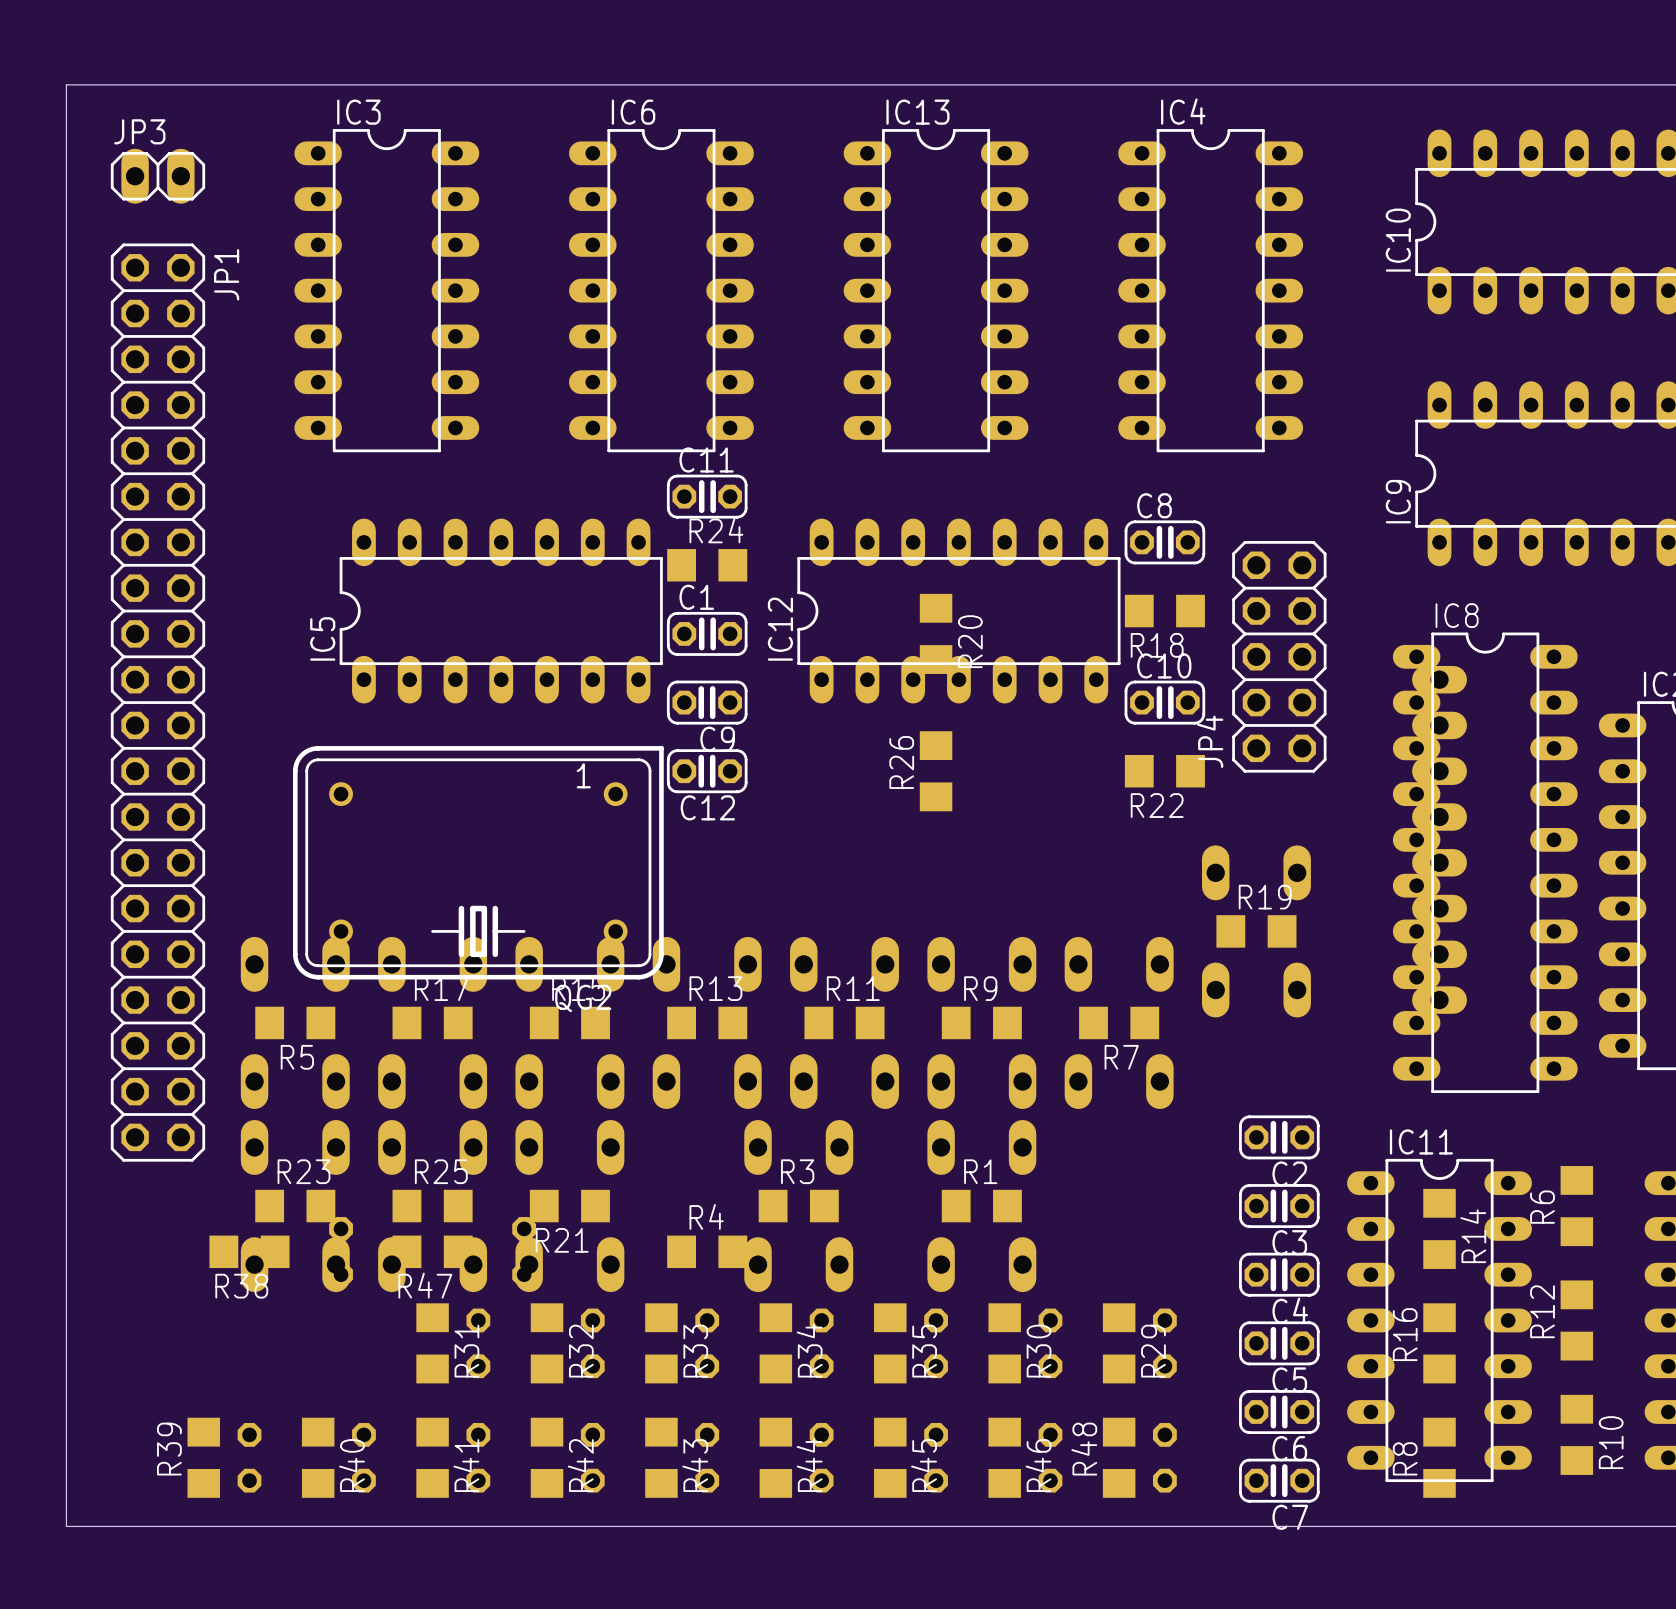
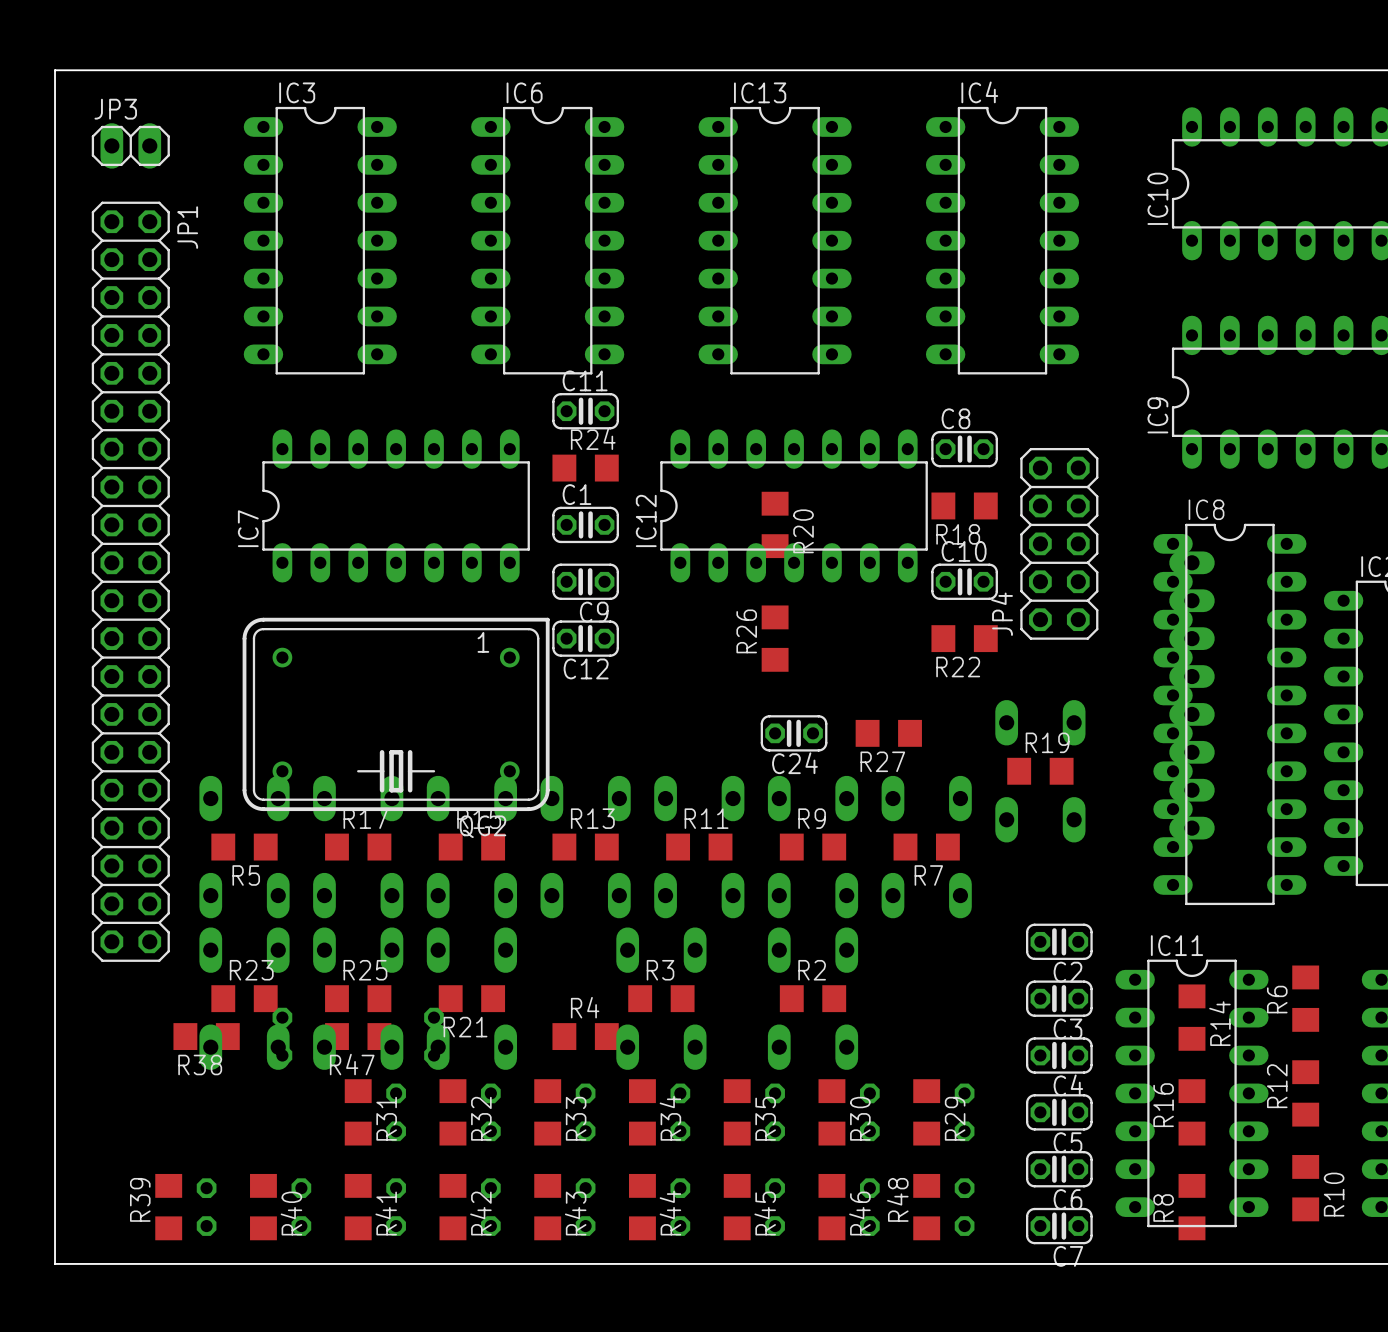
IC7: none -> (396, 505)
IC5: (501, 611) -> none
C24: none -> (794, 733)
R27: none -> (888, 733)
R1 name: R1 (980, 1171) -> R2 (812, 970)

